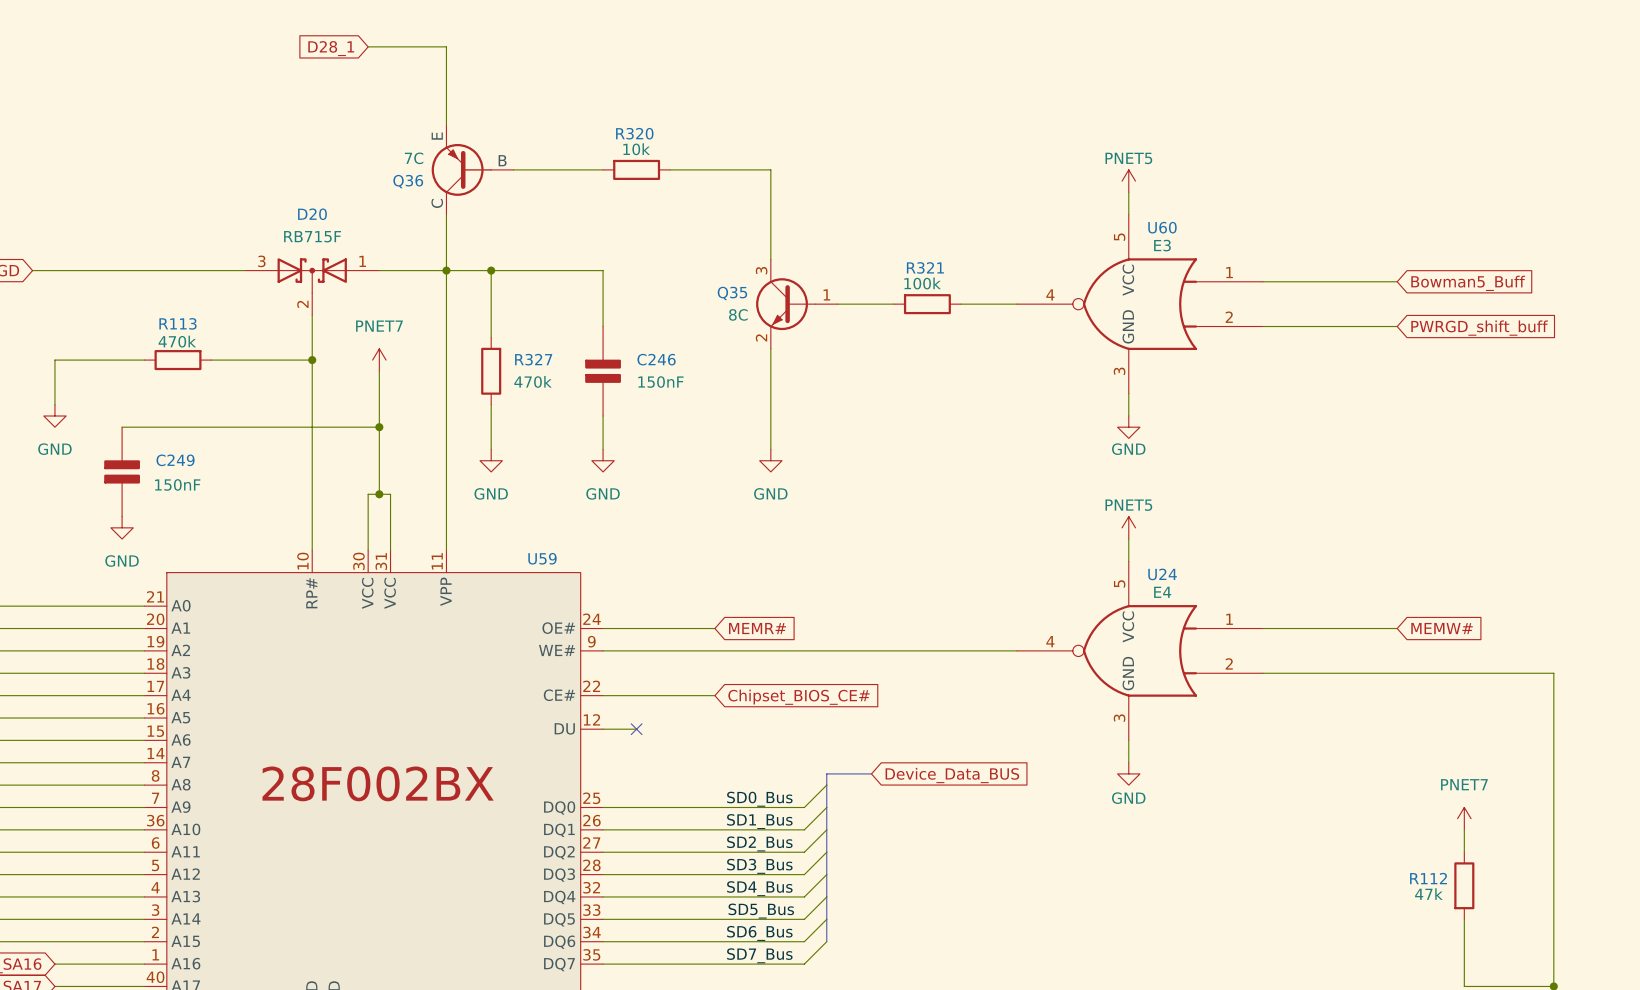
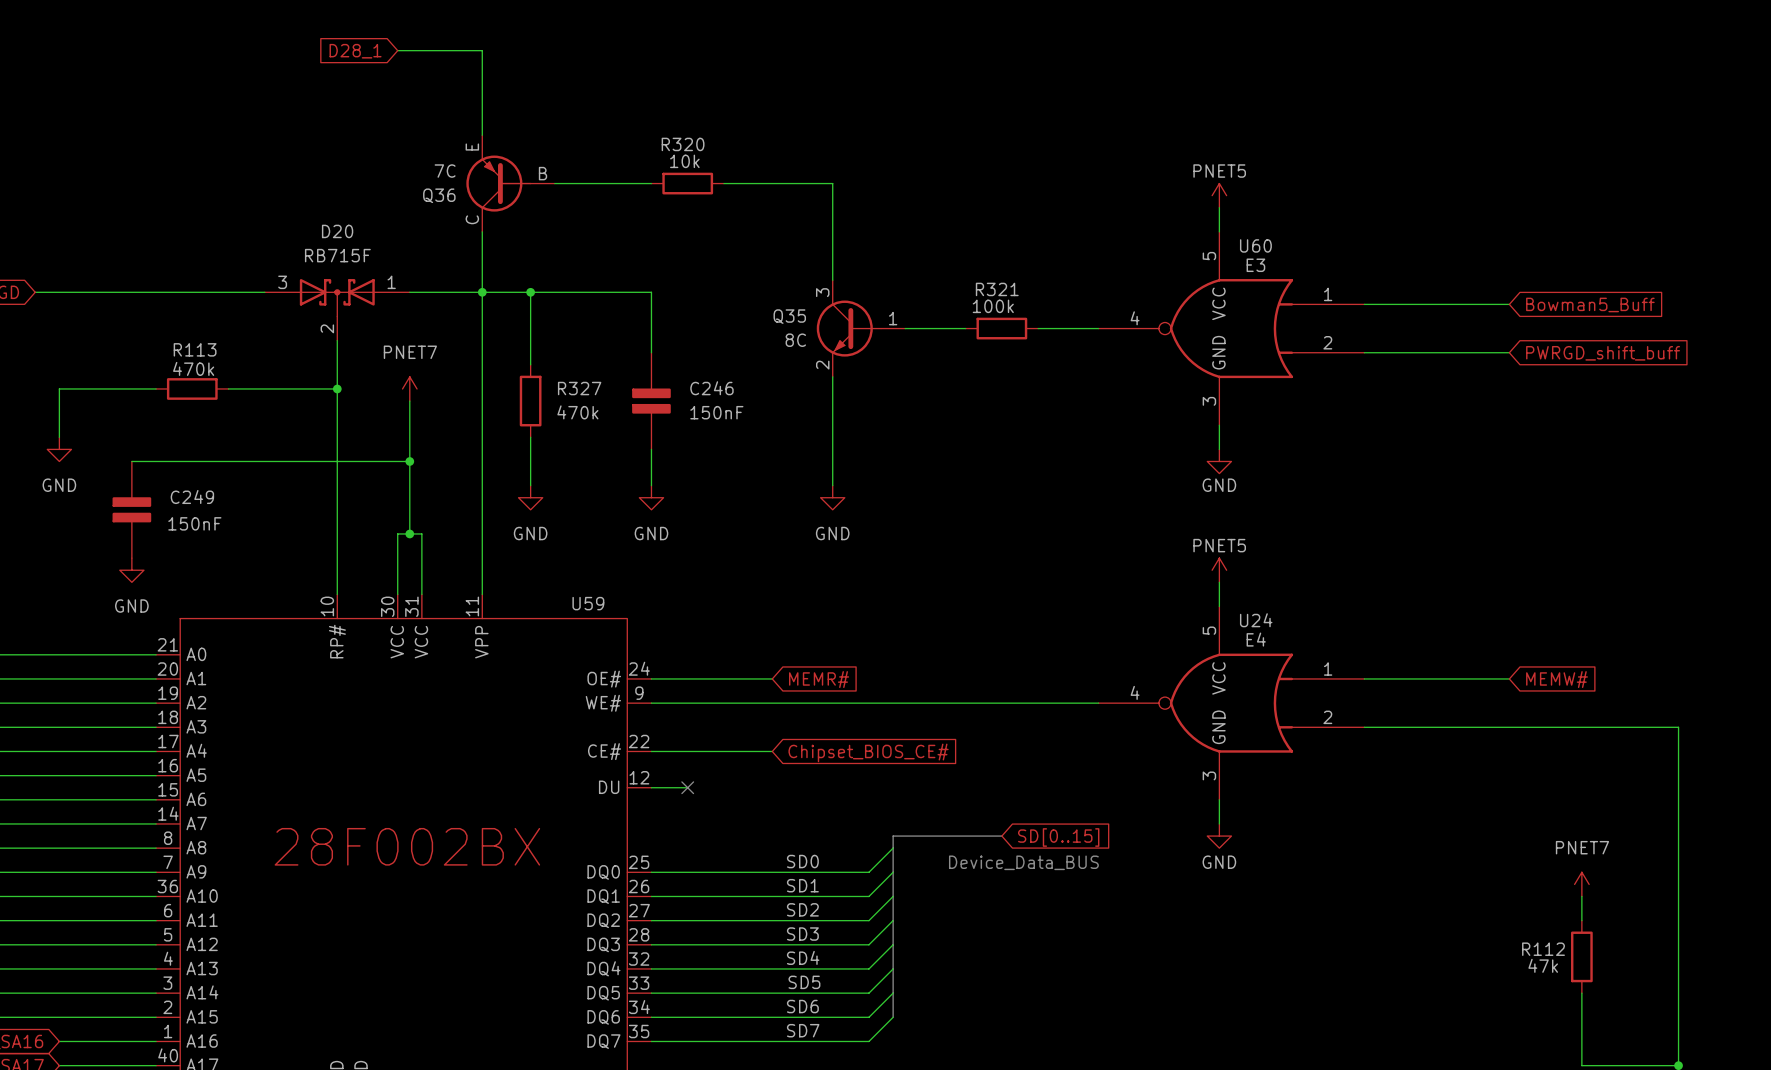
bus: none -> (941, 836) (1001, 836)
global label: none -> SD[0..15] (1058, 837)
global label: Device_Data_BUS (952, 775) -> none
label: SD0_Bus (759, 799) -> SD0 (802, 861)
text: none -> Device_Data_BUS (1023, 862)
label: SD1_Bus (759, 821) -> SD1 (802, 885)
label: SD2_Bus (759, 843) -> SD2 (802, 909)
label: SD3_Bus (759, 866) -> SD3 (802, 934)
label: SD4_Bus (759, 888) -> SD4 (803, 957)
label: SD5_Bus (761, 911) -> SD5 (804, 982)
label: SD6_Bus (759, 933) -> SD6 (802, 1006)
label: SD7_Bus (759, 955) -> SD7 (803, 1030)

